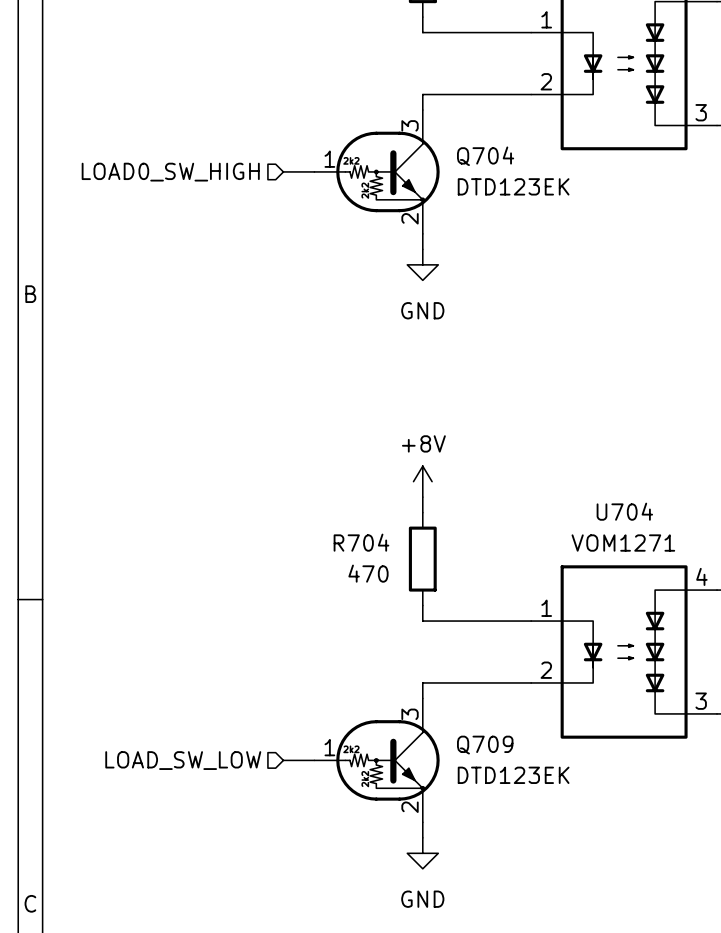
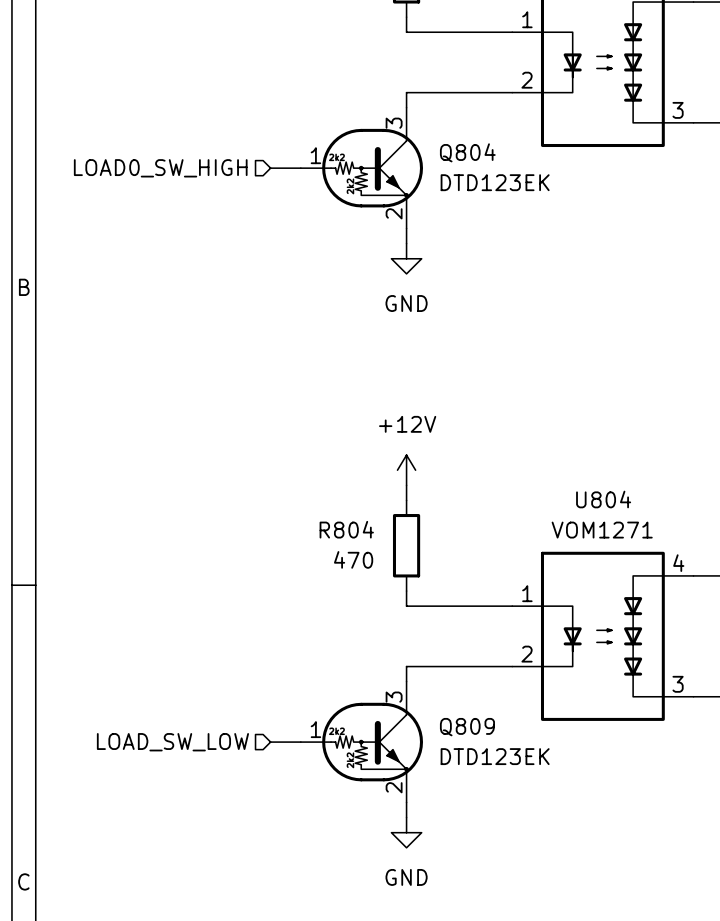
Q704 name: Q704 (485, 156) -> Q804 (467, 152)
power symbol: +8V (422, 481) -> +12V (406, 470)
U704 name: U704 (624, 511) -> U804 (603, 499)
R704 name: R704 (361, 542) -> R804 (346, 529)
Q709 name: Q709 (485, 745) -> Q809 (467, 727)

